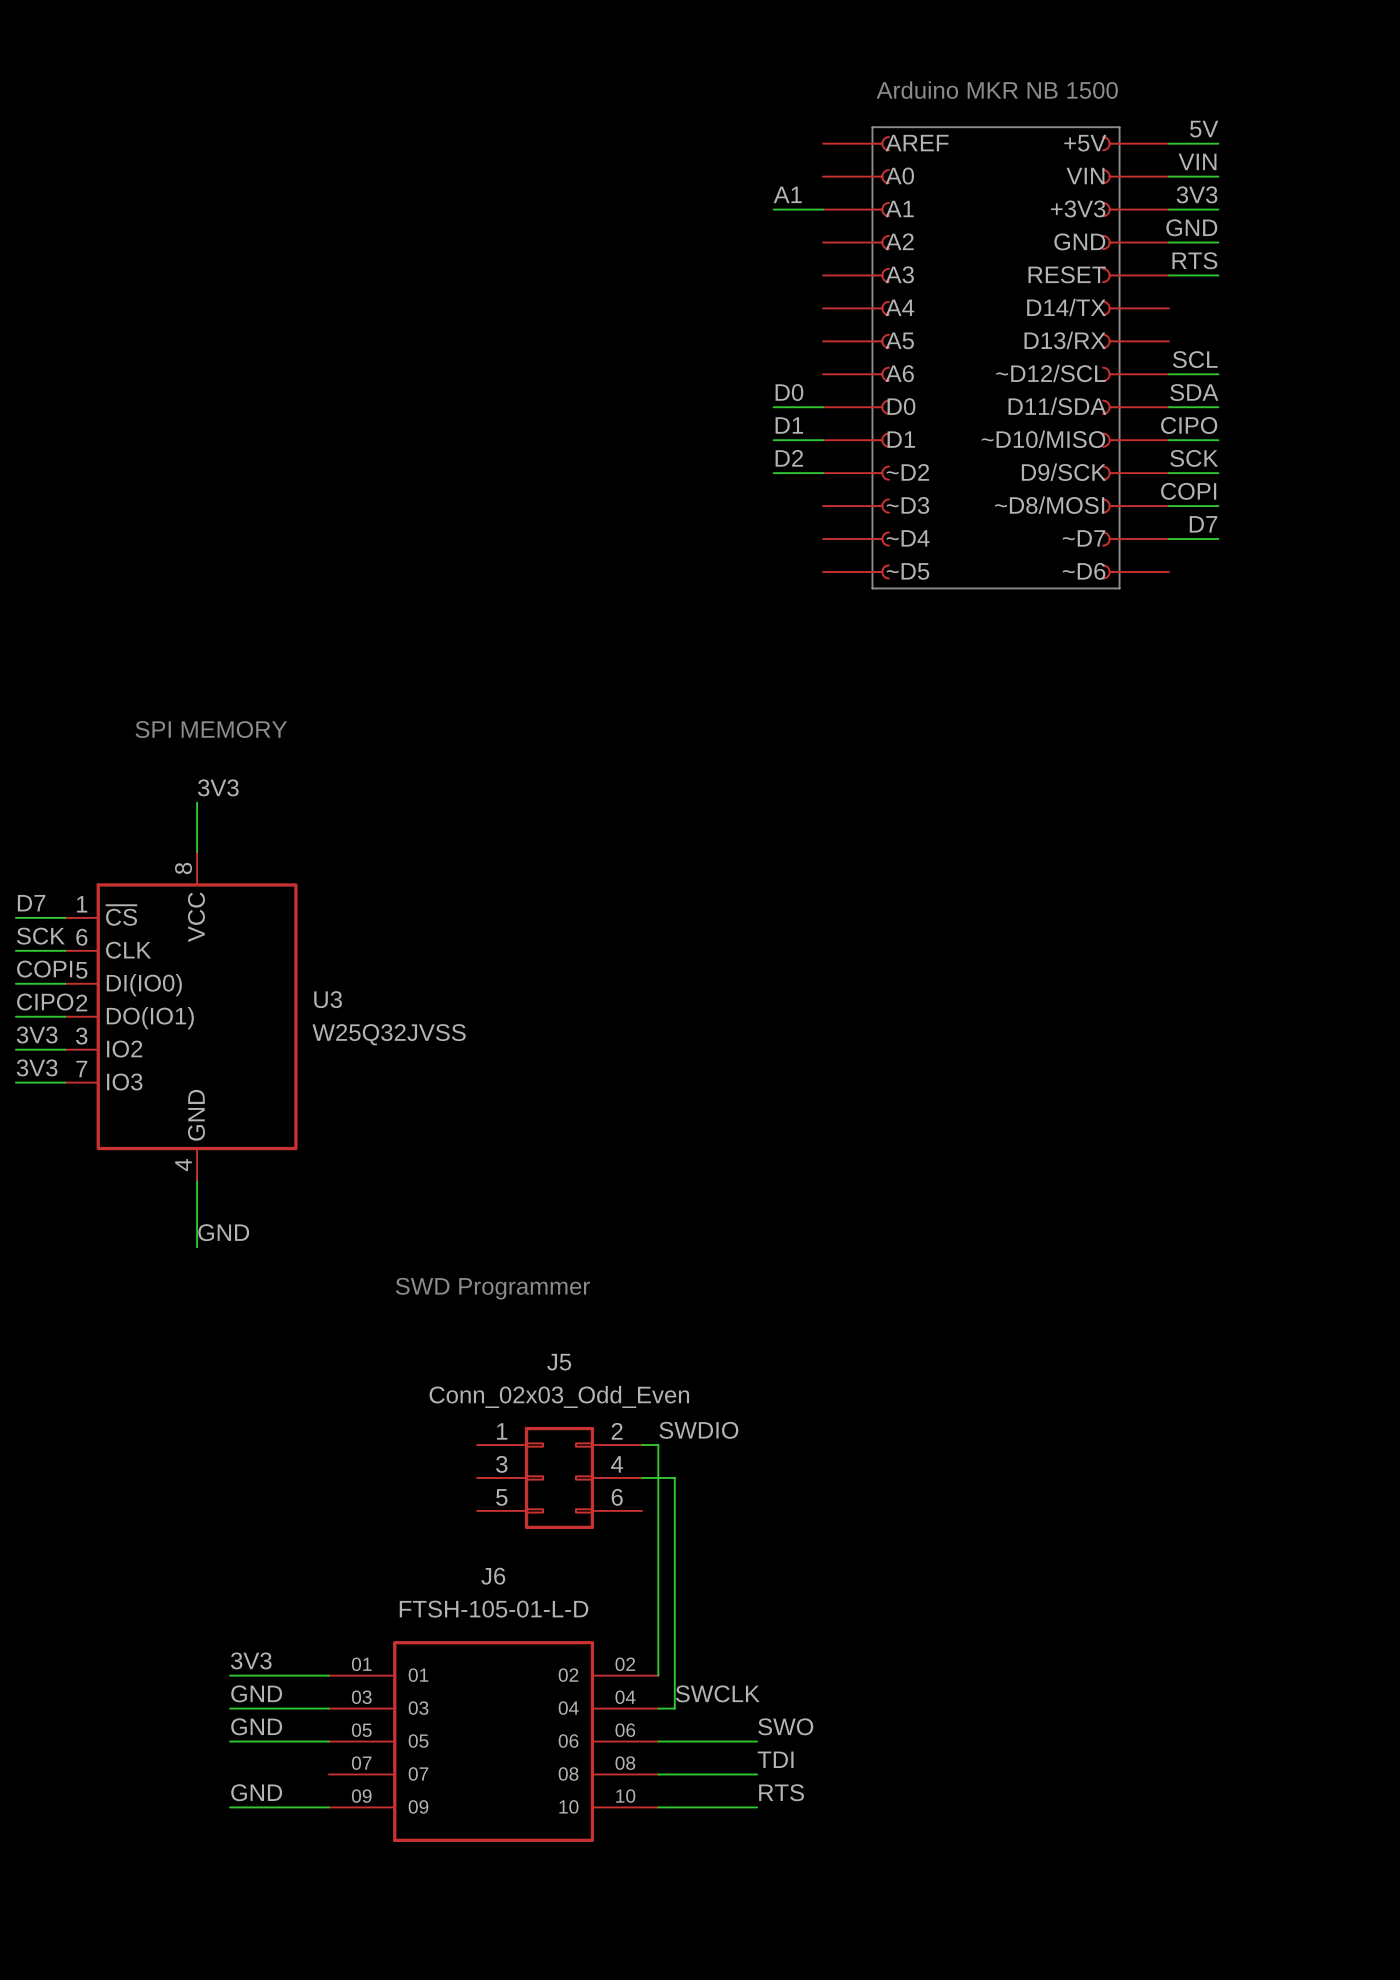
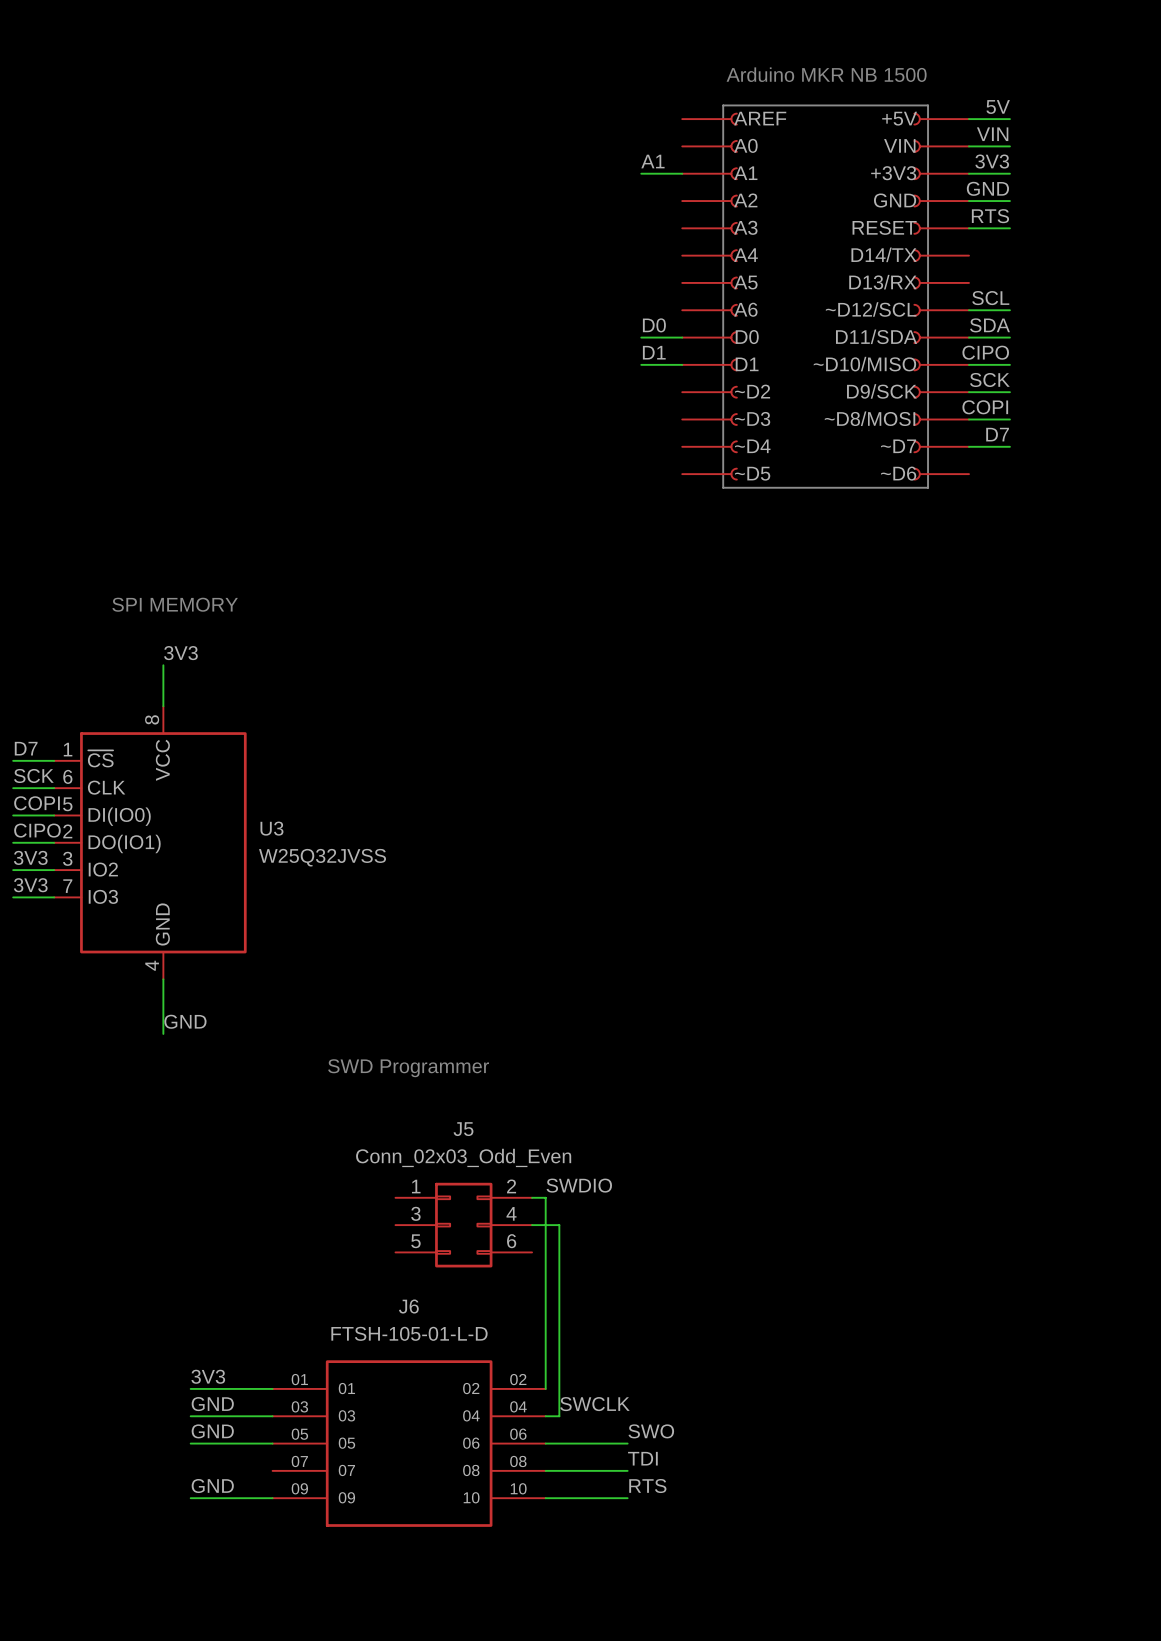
label: D2 (789, 458) -> none
wire: (773, 473) (823, 473) -> none

